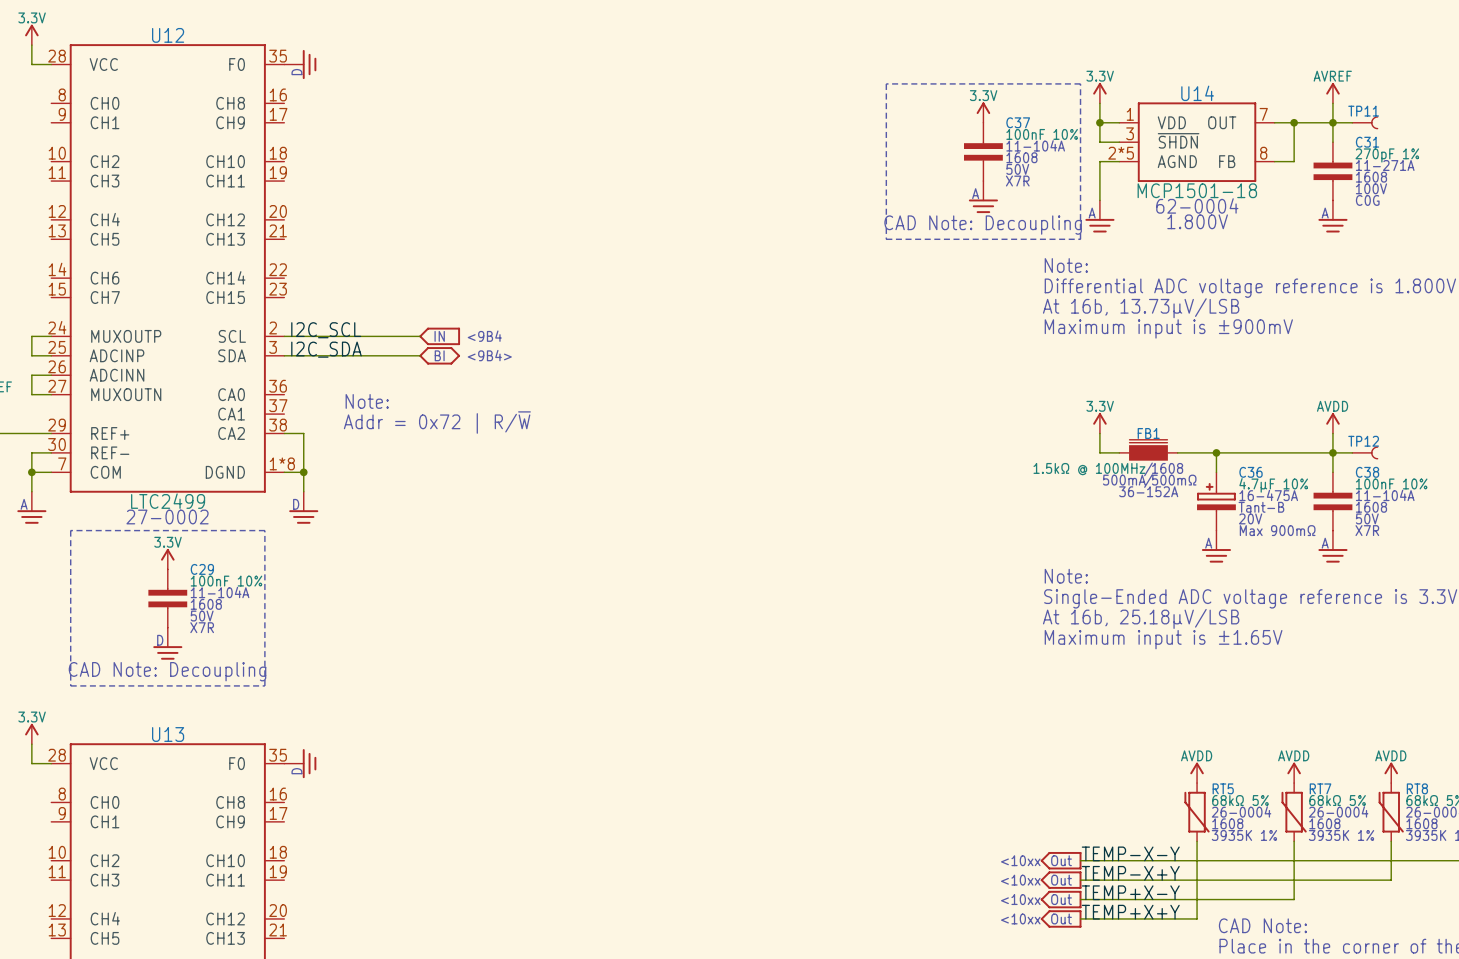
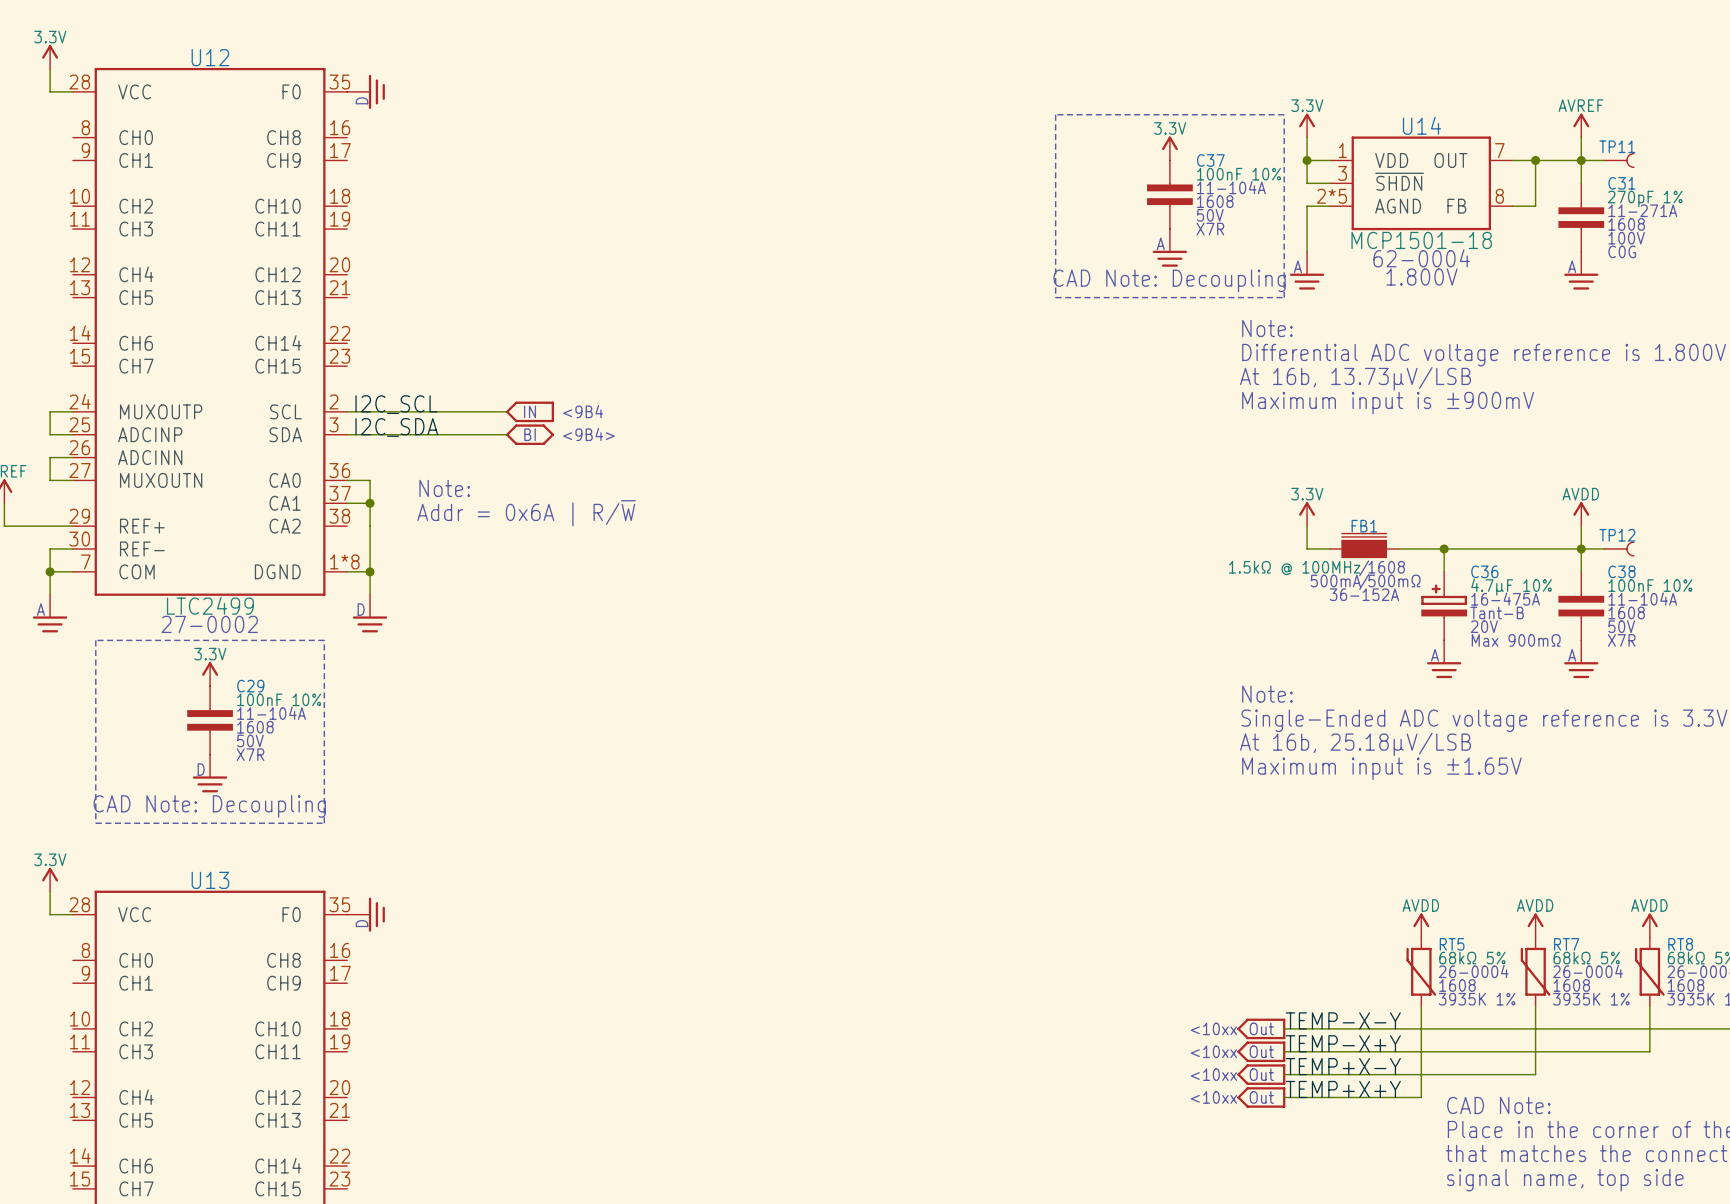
wire: none -> (347, 503) (370, 503)
junction: none -> (370, 503)
text: Addr = 0x72 | R/~{W} (437, 422) -> Addr = 0x6A | R/~{W} (526, 513)
wire: (284, 433) (303, 433) -> (347, 480) (370, 480) (370, 526)

